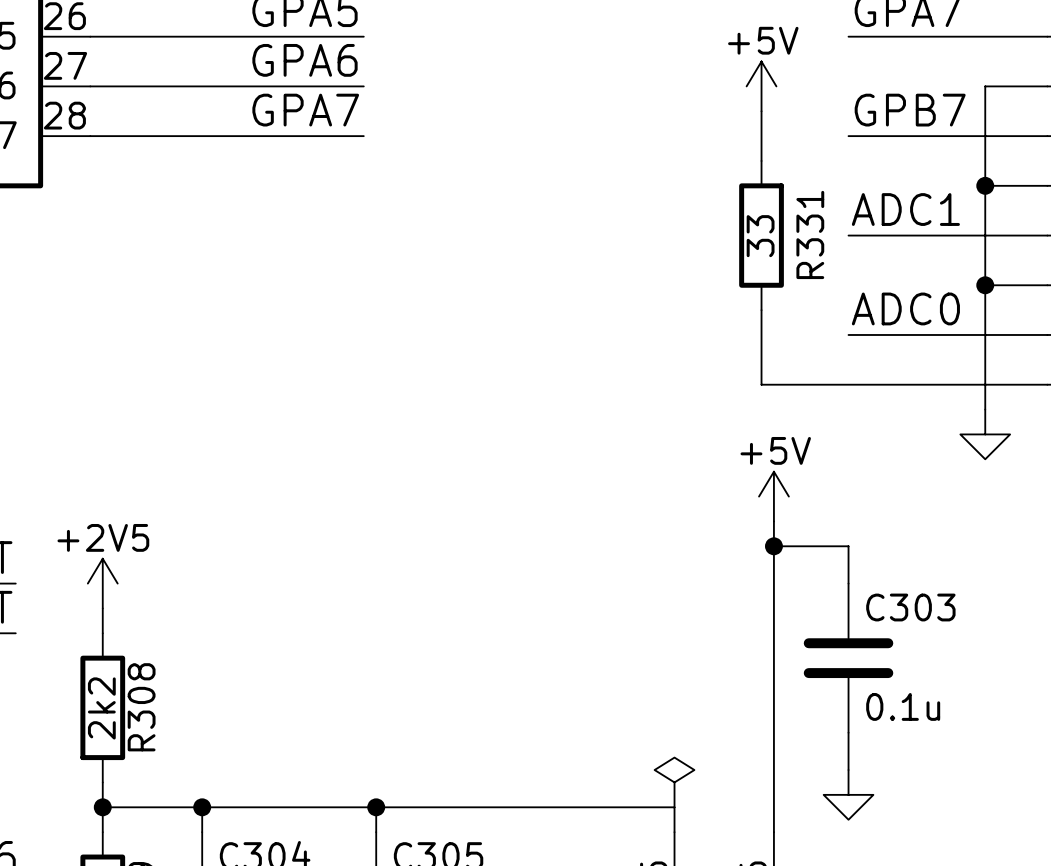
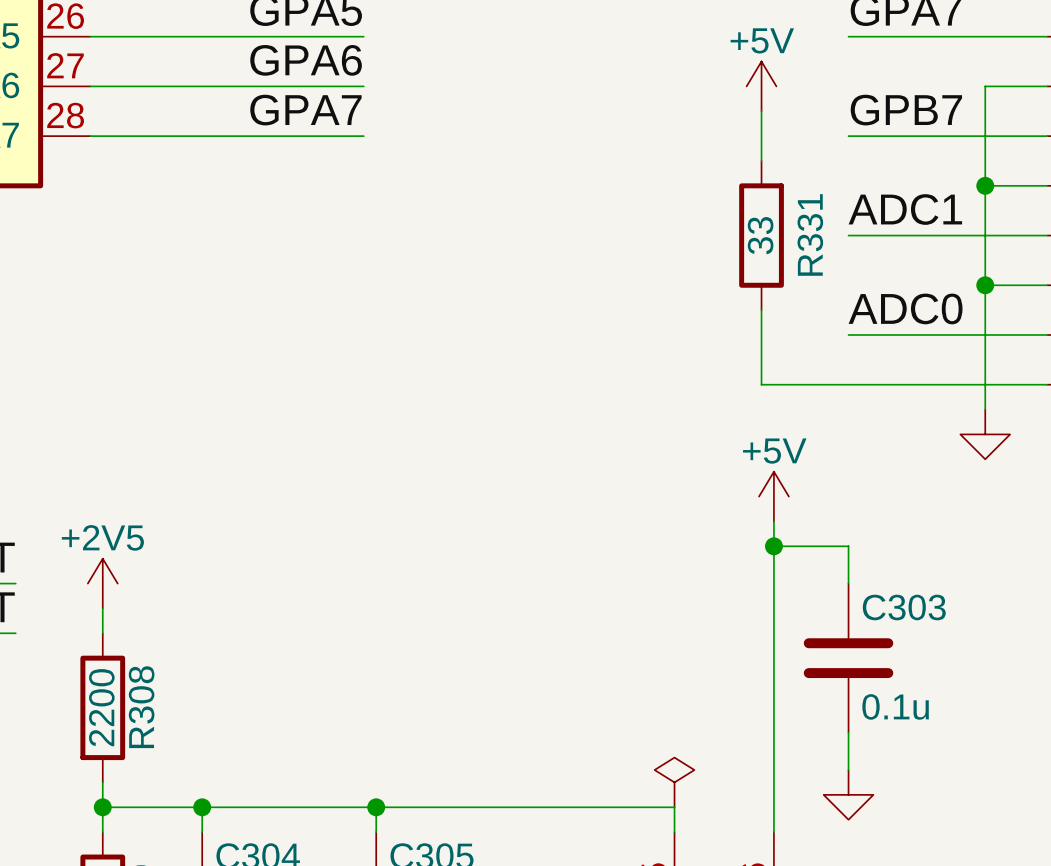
R308 value: 2k2 (101, 708) -> 2200 (101, 707)

